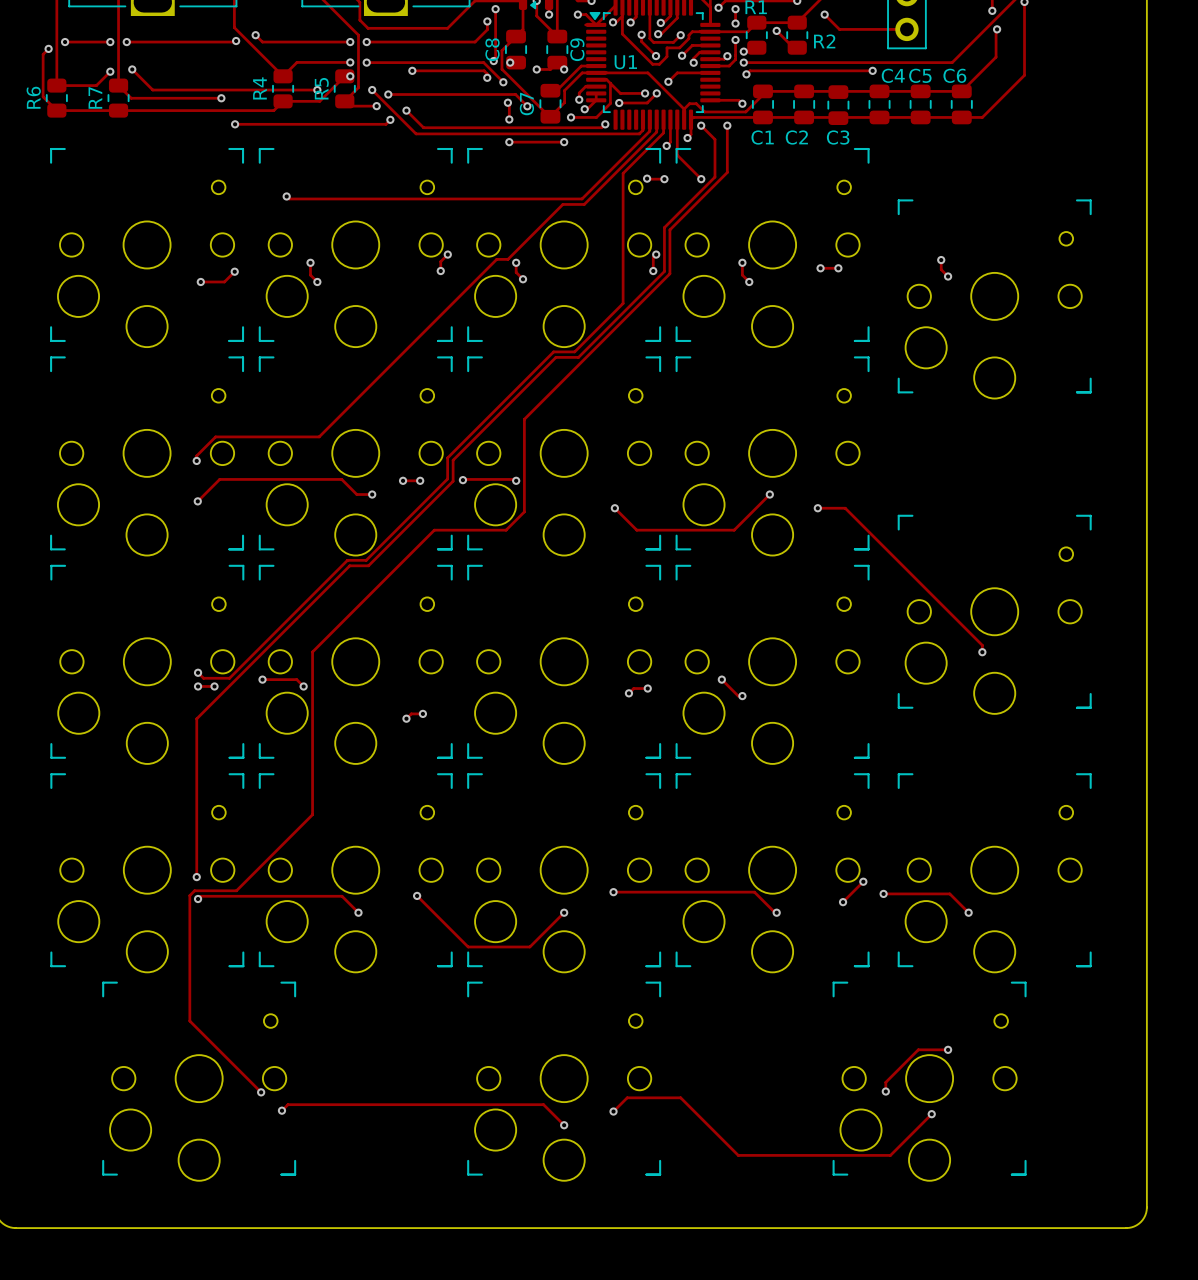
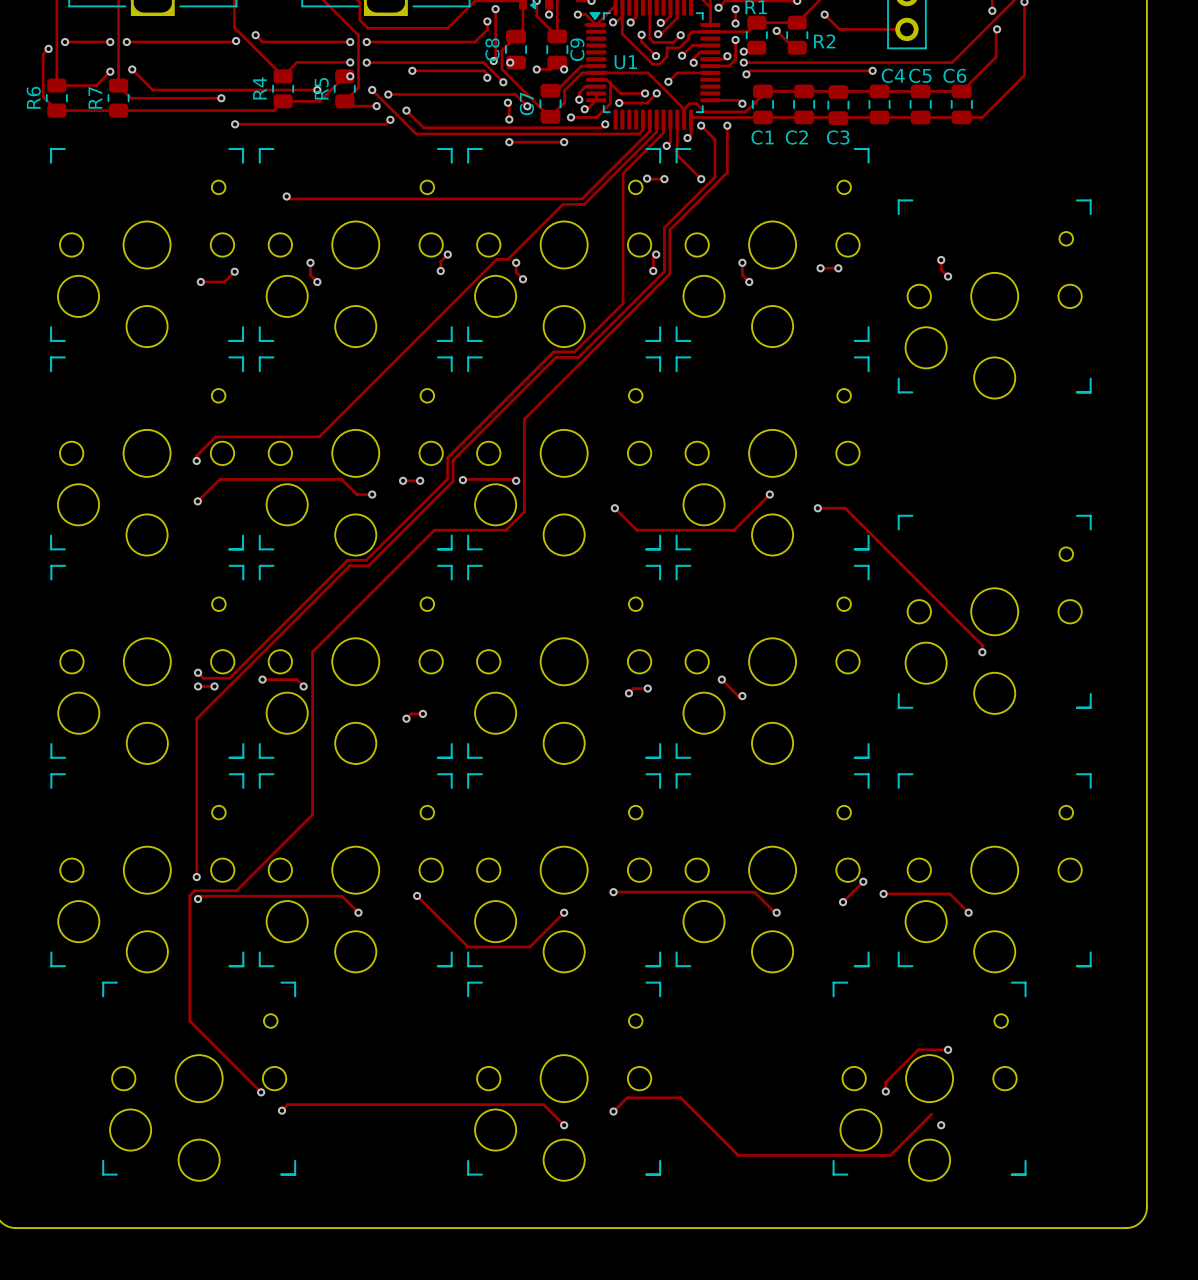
via position: (931, 1114) -> (941, 1125)

